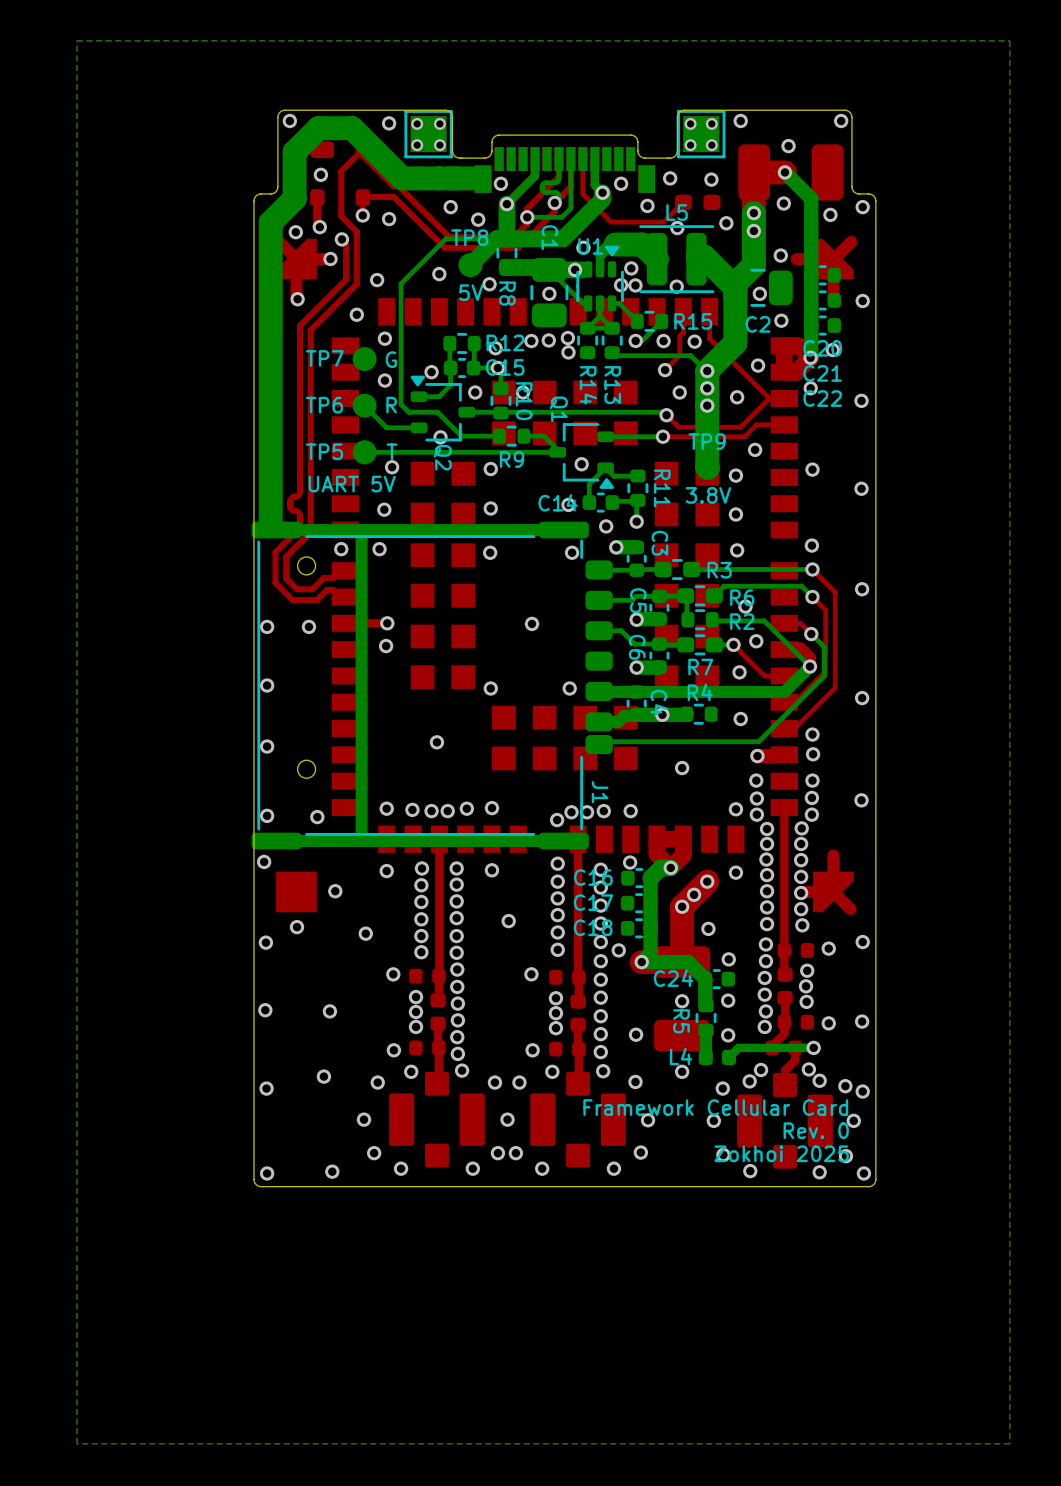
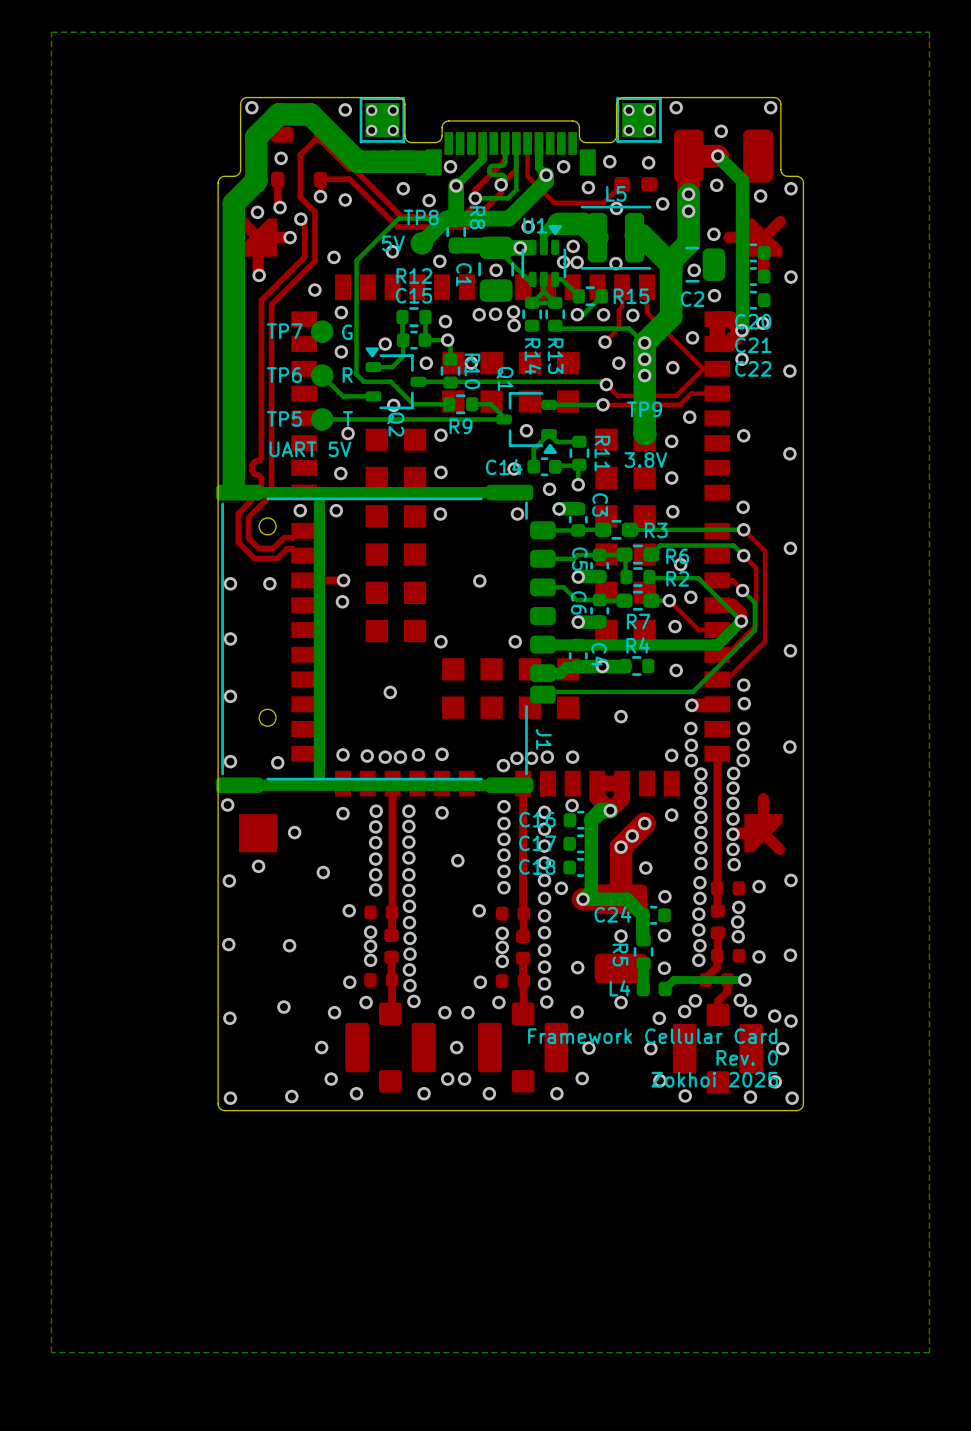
C1 name position: C1 (549, 237) -> C1 (463, 274)
text position: 5V (471, 292) -> 5V (393, 243)
R8 name position: R8 (507, 293) -> R8 (477, 217)
R12 name position: R12 (505, 342) -> R12 (414, 276)
C15 name position: C15 (505, 367) -> C15 (413, 295)

